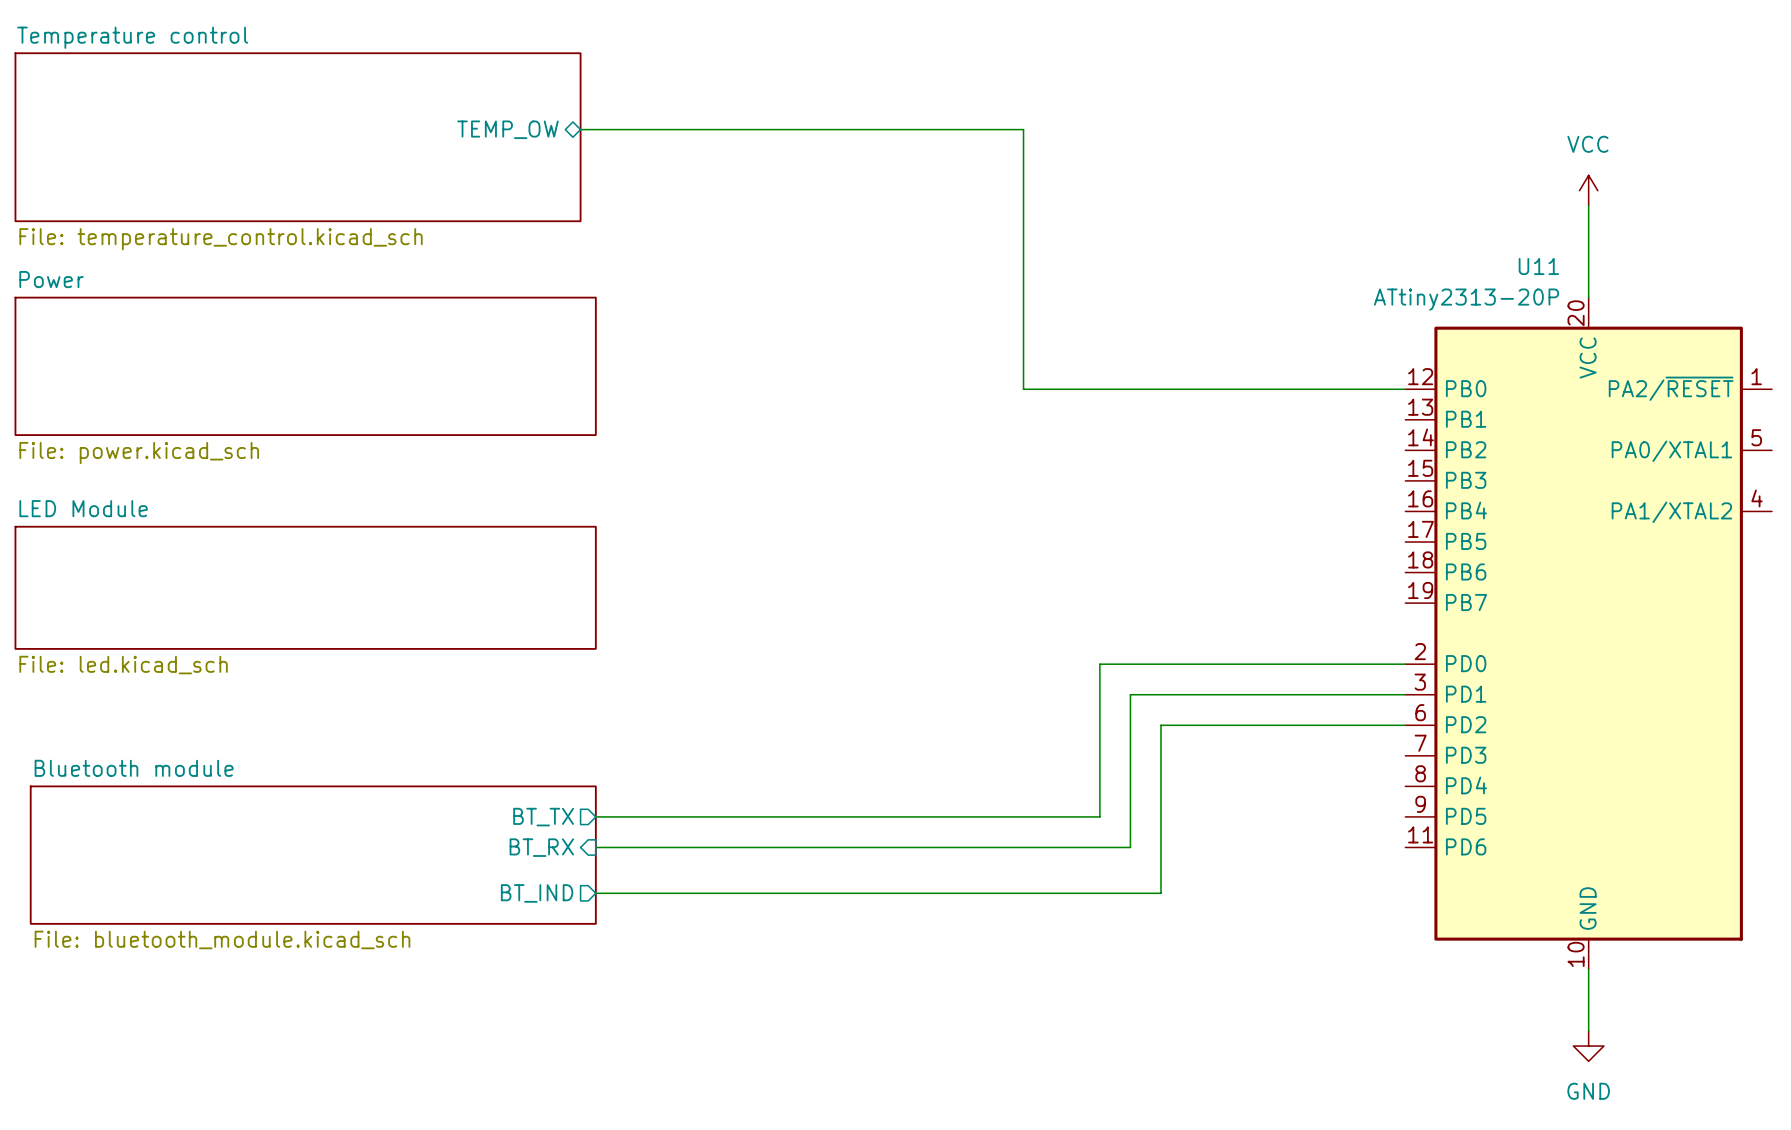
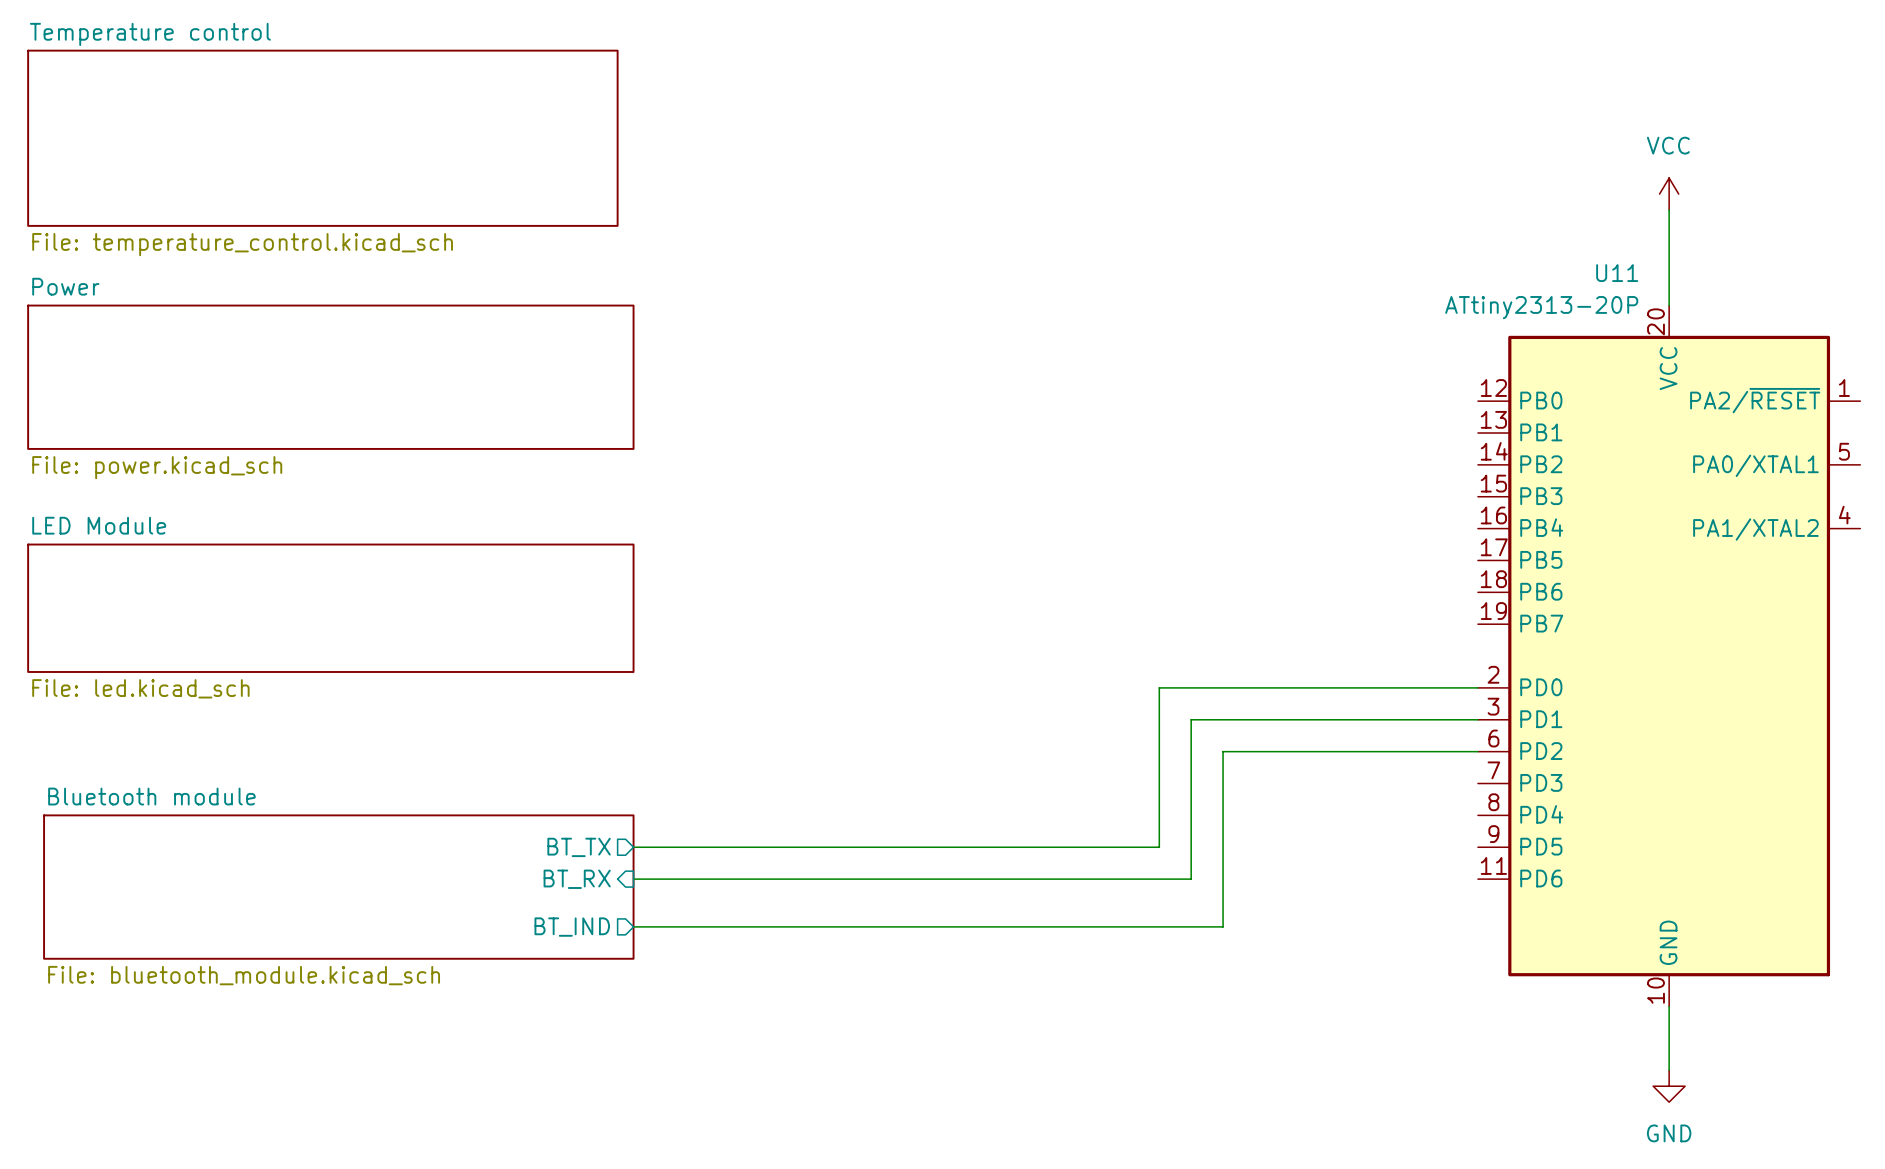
sheet pin: TEMP_OW (507, 129) -> none
wire: (580, 129) (1023, 129) (1023, 389) (1405, 389) -> none

